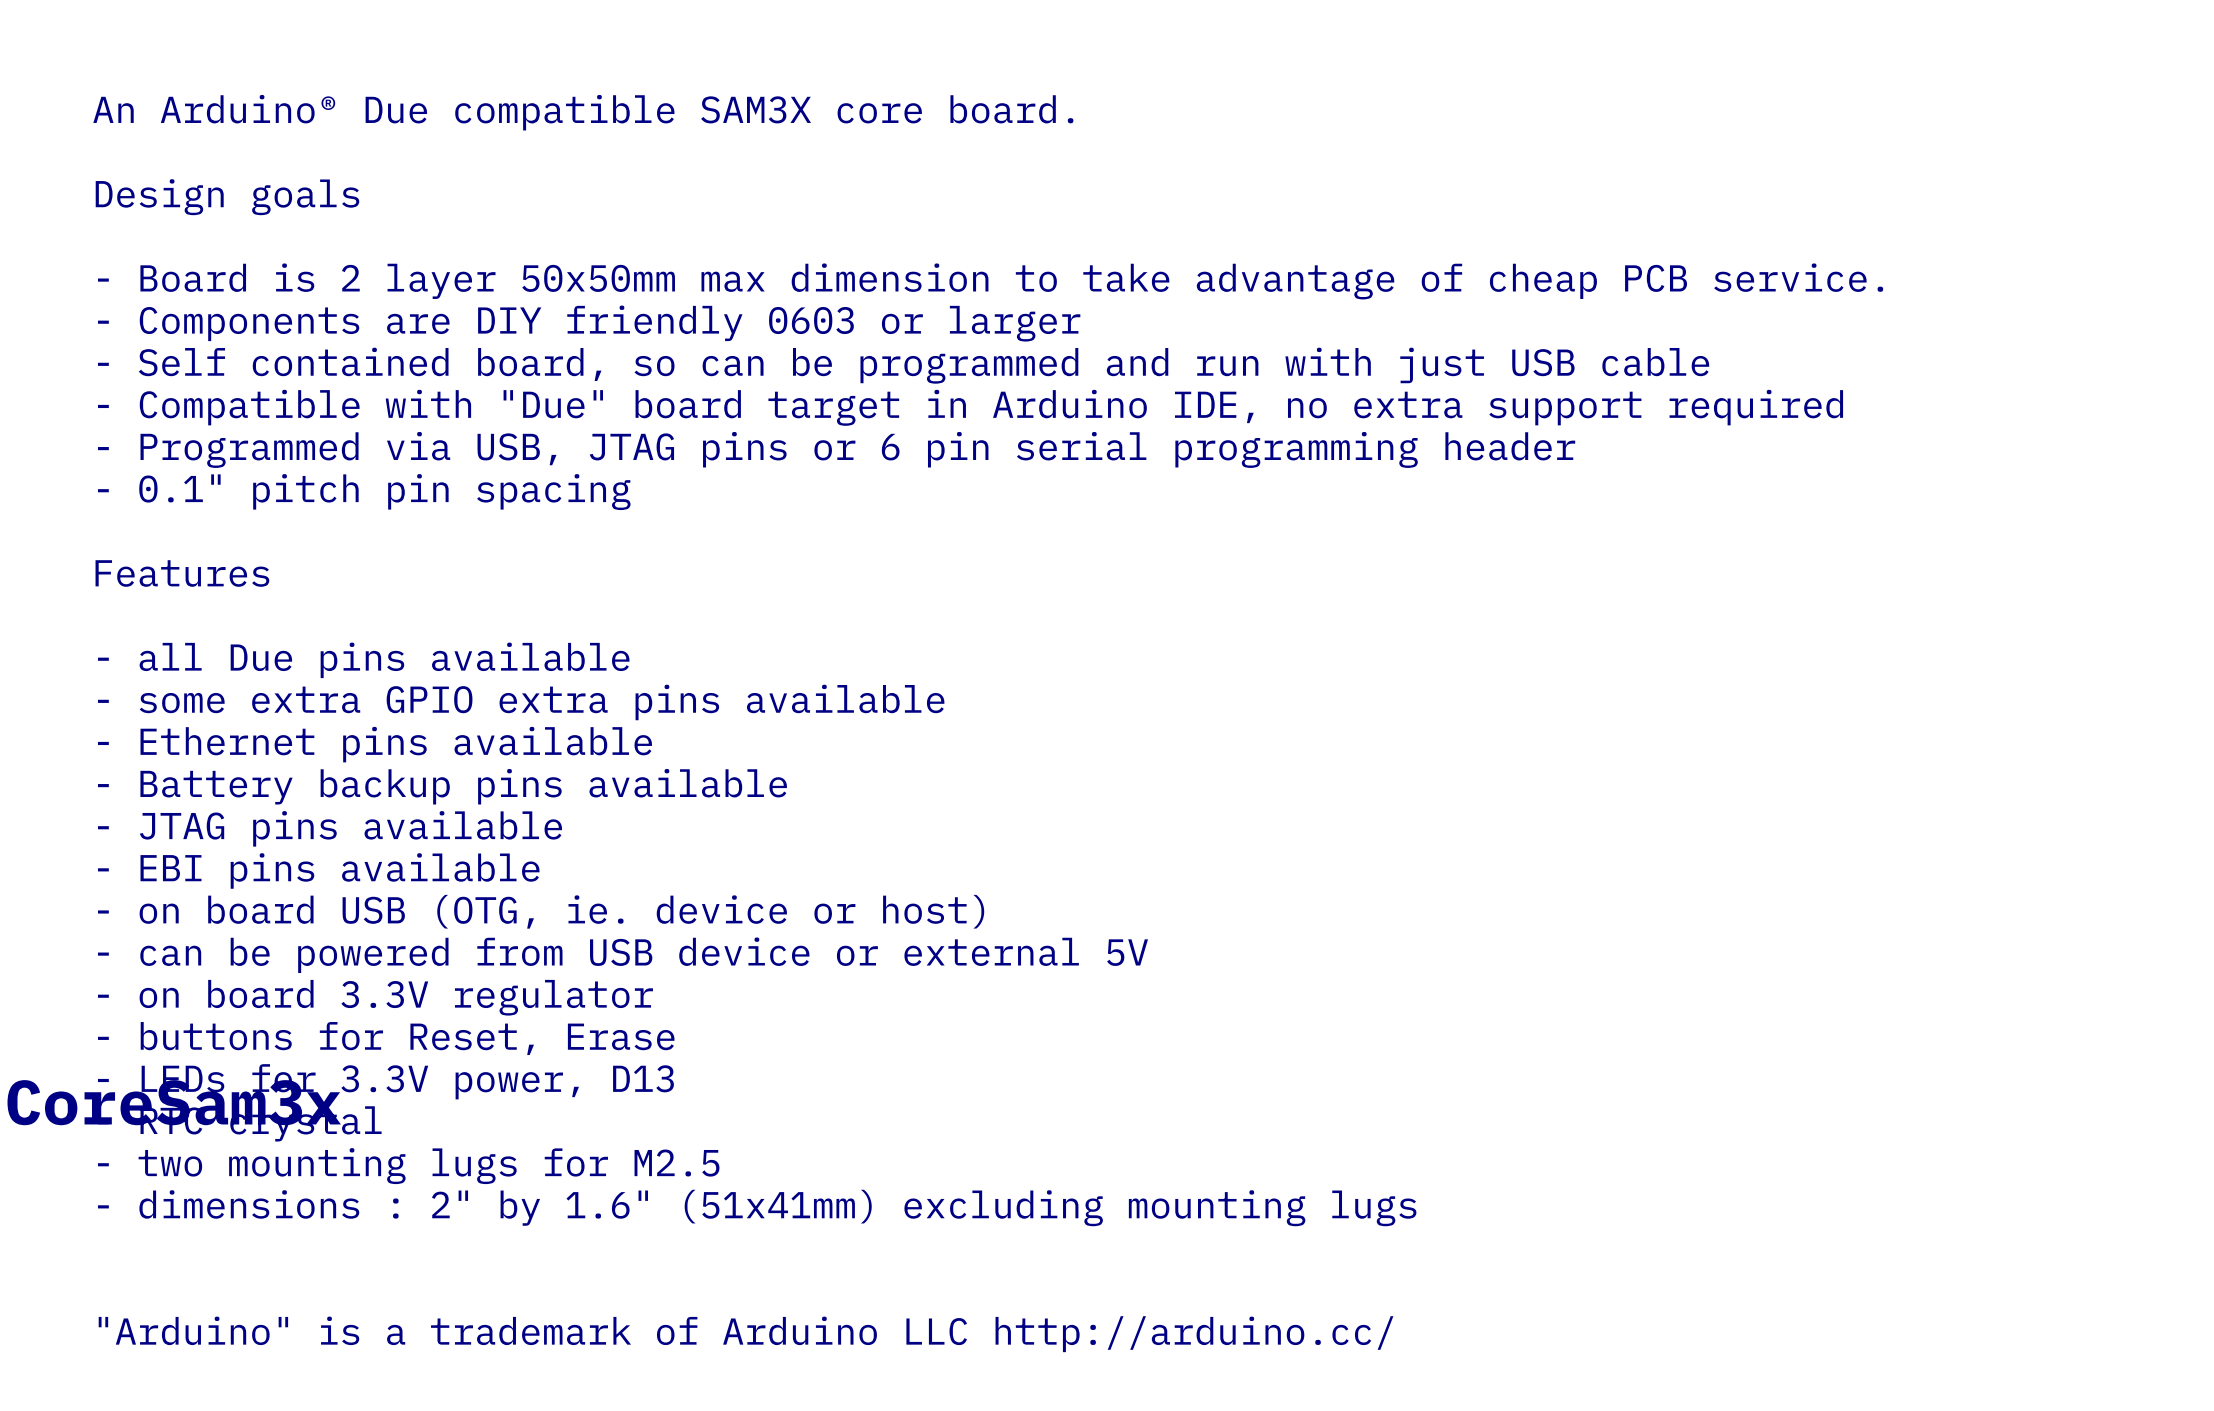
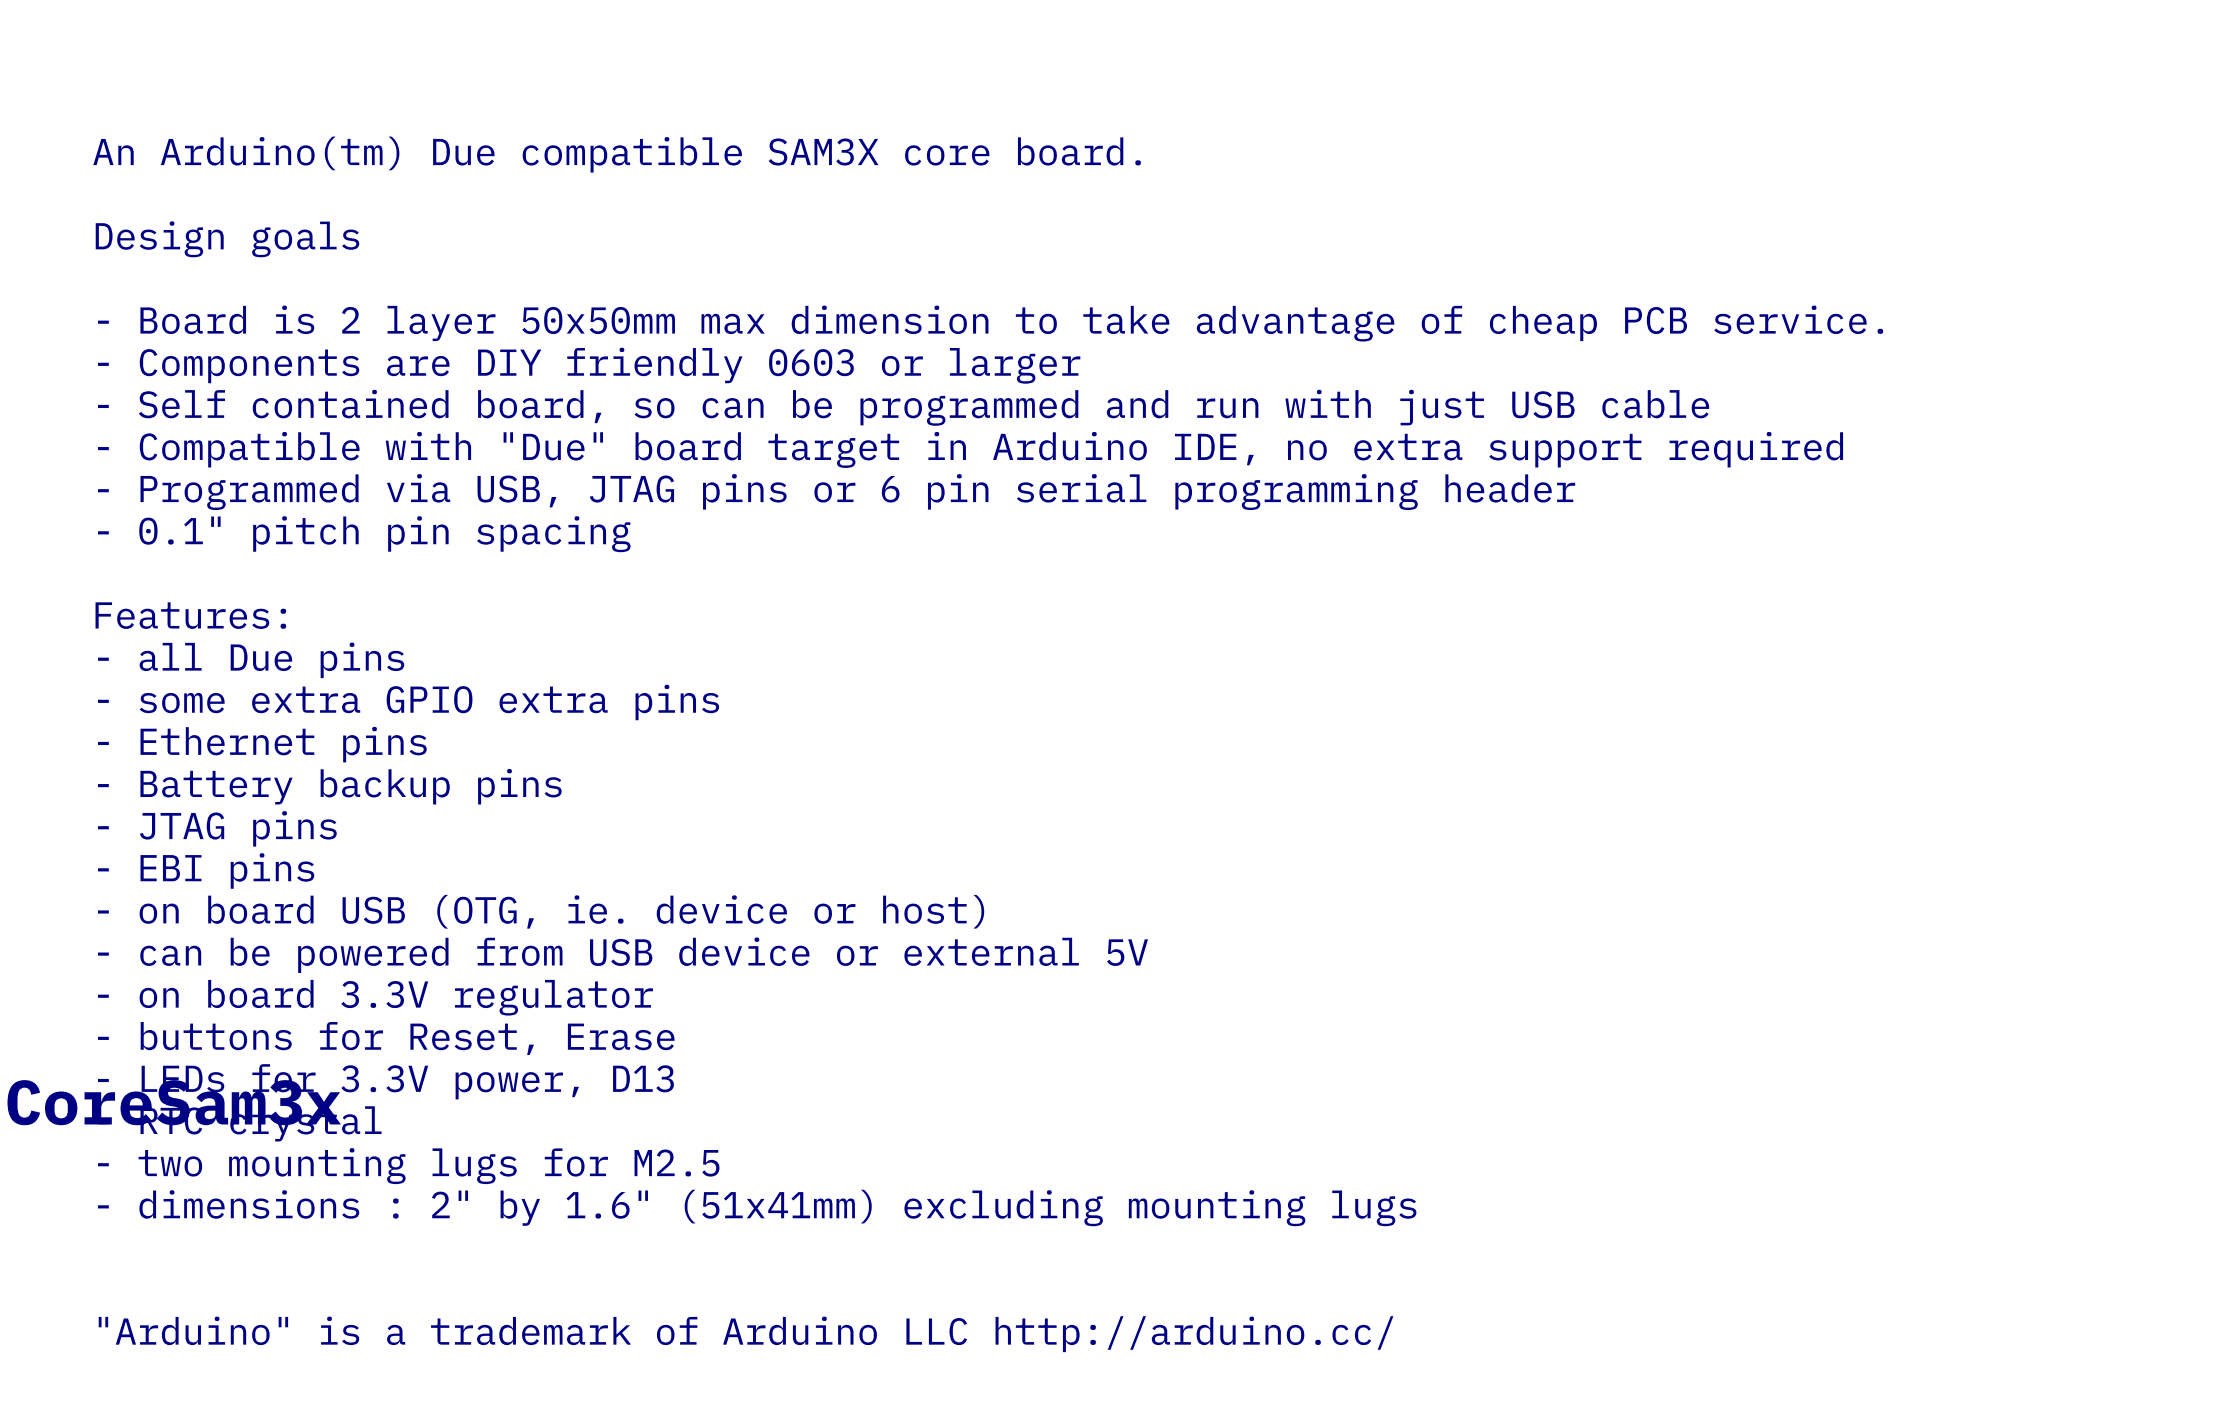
text: An Arduino® Due compatible SAM3X core board. (583, 112) -> An Arduino(tm) Due compatible SAM3X core board. (617, 154)
text position: Design goals (227, 197) -> Design goals (227, 239)
text: - Board is 2 layer 50x50mm max dimension to take advantage of cheap PCB service. (990, 281) -> none
text: - Components are DIY friendly 0603 or larger (589, 323) -> - Board is 2 layer 50x50mm max dimension to take advantage of cheap PCB service. (990, 323)
text: - Self contained board, so can be programmed and run with just USB cable (903, 365) -> - Components are DIY friendly 0603 or larger (589, 365)
text: - Compatible with "Due" board target in Arduino IDE, no extra support required (970, 407) -> - Self contained board, so can be programmed and run with just USB cable (903, 407)
text: - Programmed via USB, JTAG pins or 6 pin serial programming header (836, 449) -> - Compatible with "Due" board target in Arduino IDE, no extra support required (970, 449)
text: - 0.1" pitch pin spacing (364, 492) -> - Programmed via USB, JTAG pins or 6 pin serial programming header (836, 492)
text: none -> - 0.1" pitch pin spacing (364, 534)
text: Features (182, 573) -> Features: (190, 615)
text: - all Due pins available (363, 660) -> - all Due pins (251, 660)
text: - some extra GPIO extra pins available (521, 702) -> - some extra GPIO extra pins (408, 702)
text: - Ethernet pins available (374, 744) -> - Ethernet pins (262, 744)
text: - Battery backup pins available (442, 786) -> - Battery backup pins (329, 786)
text: - JTAG pins available (329, 828) -> - JTAG pins (217, 828)
text: - EBI pins available (318, 870) -> - EBI pins (206, 870)

